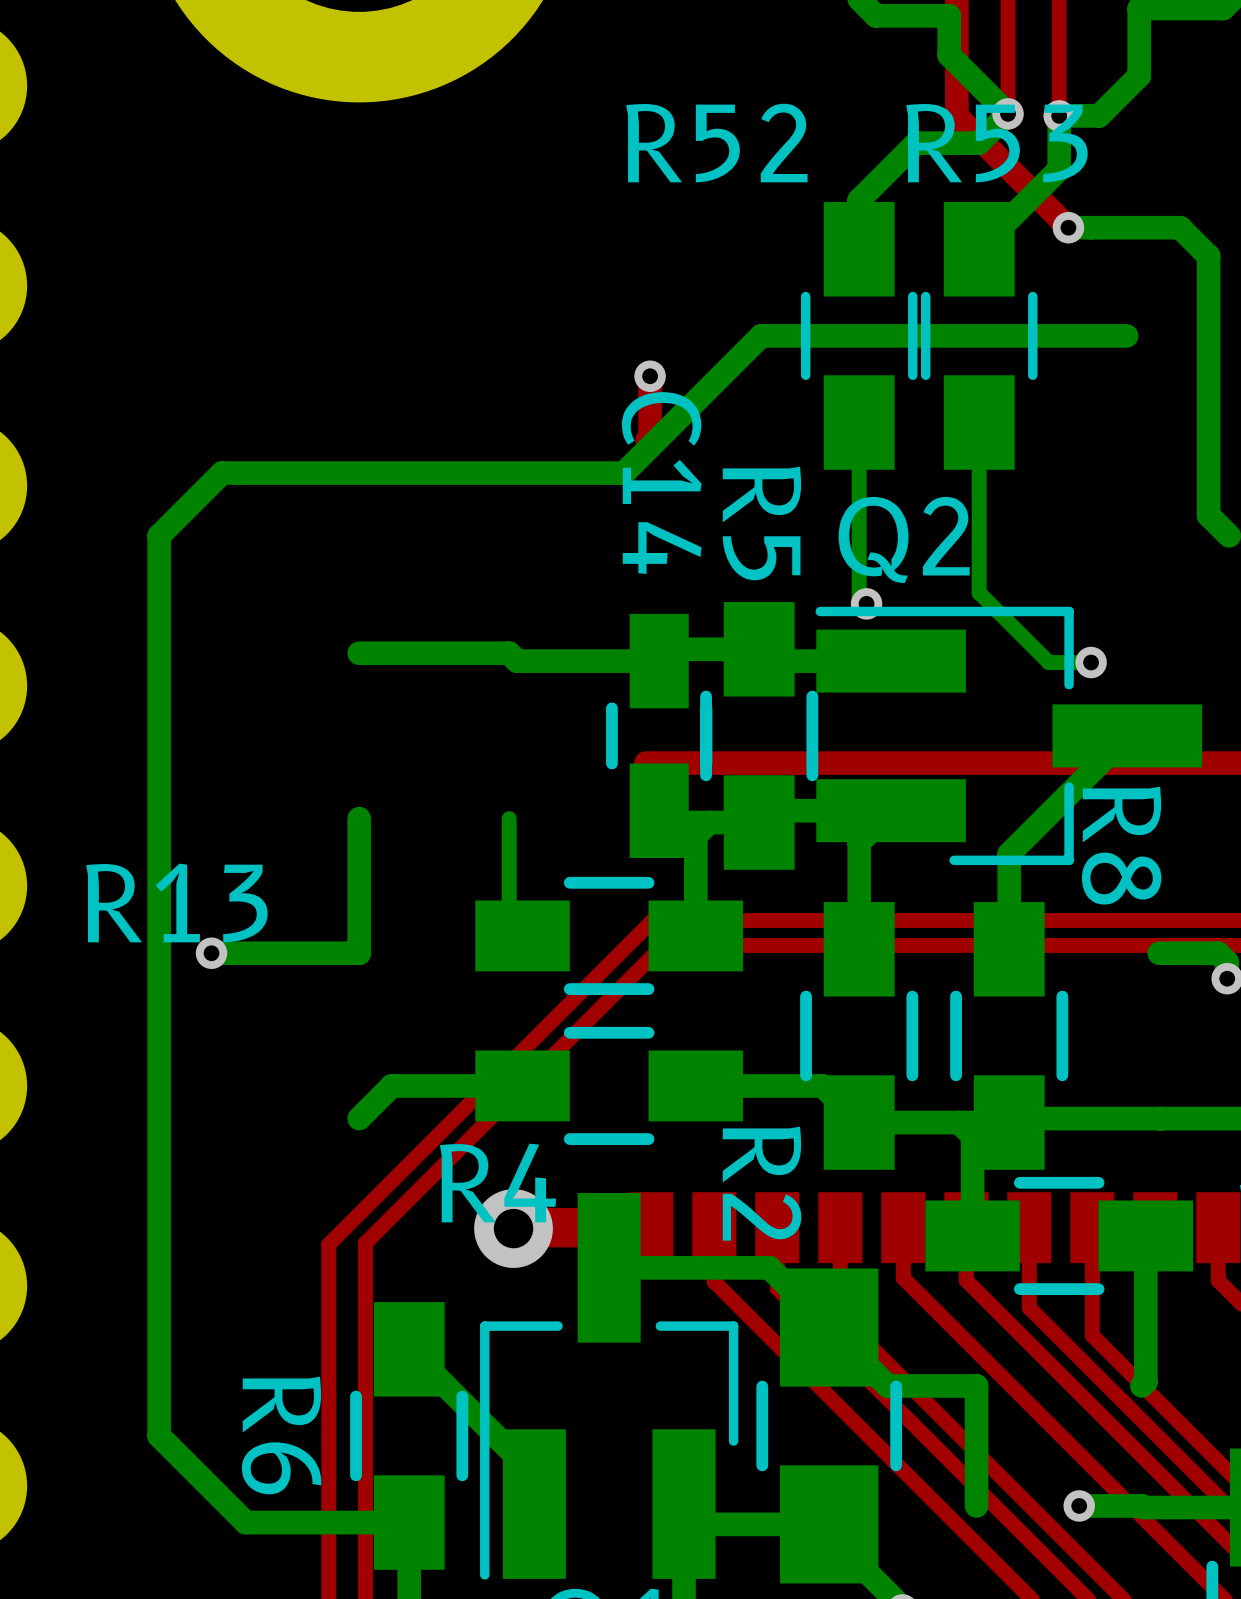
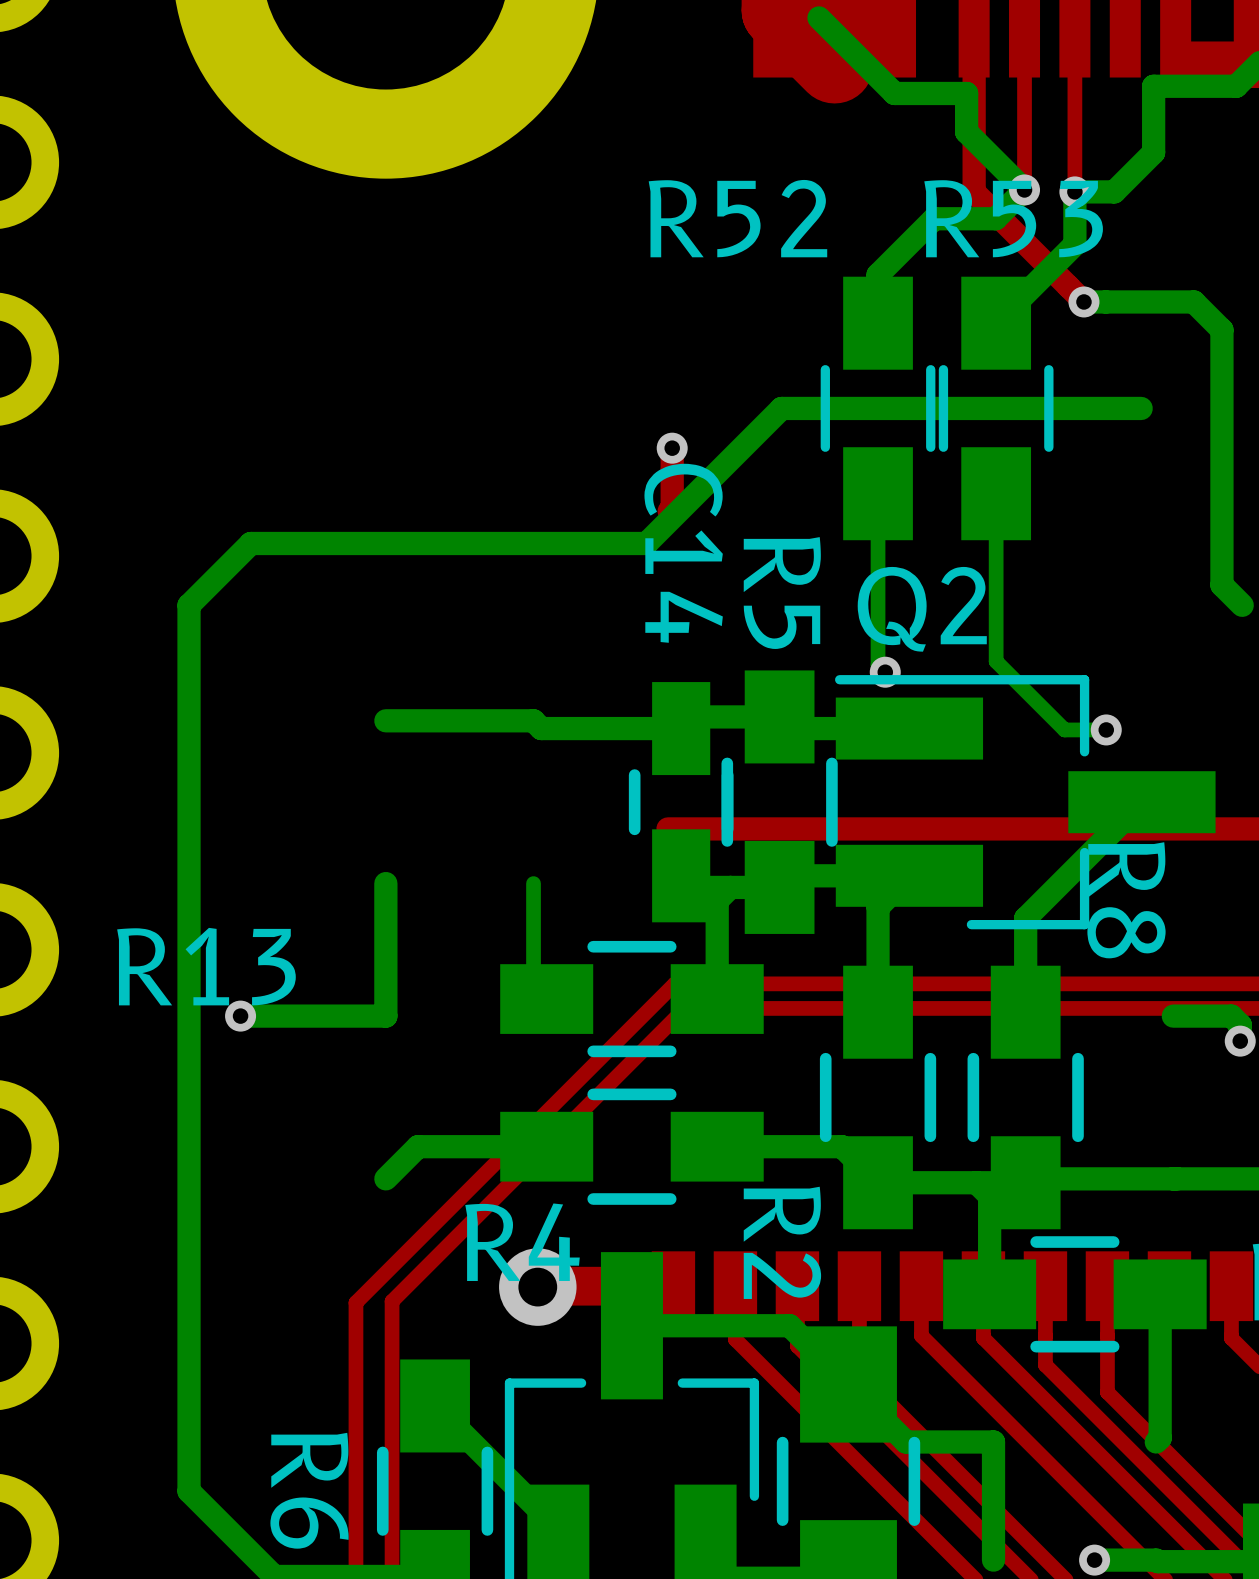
R8 name position: R8 (1121, 845) -> R8 (1126, 900)

